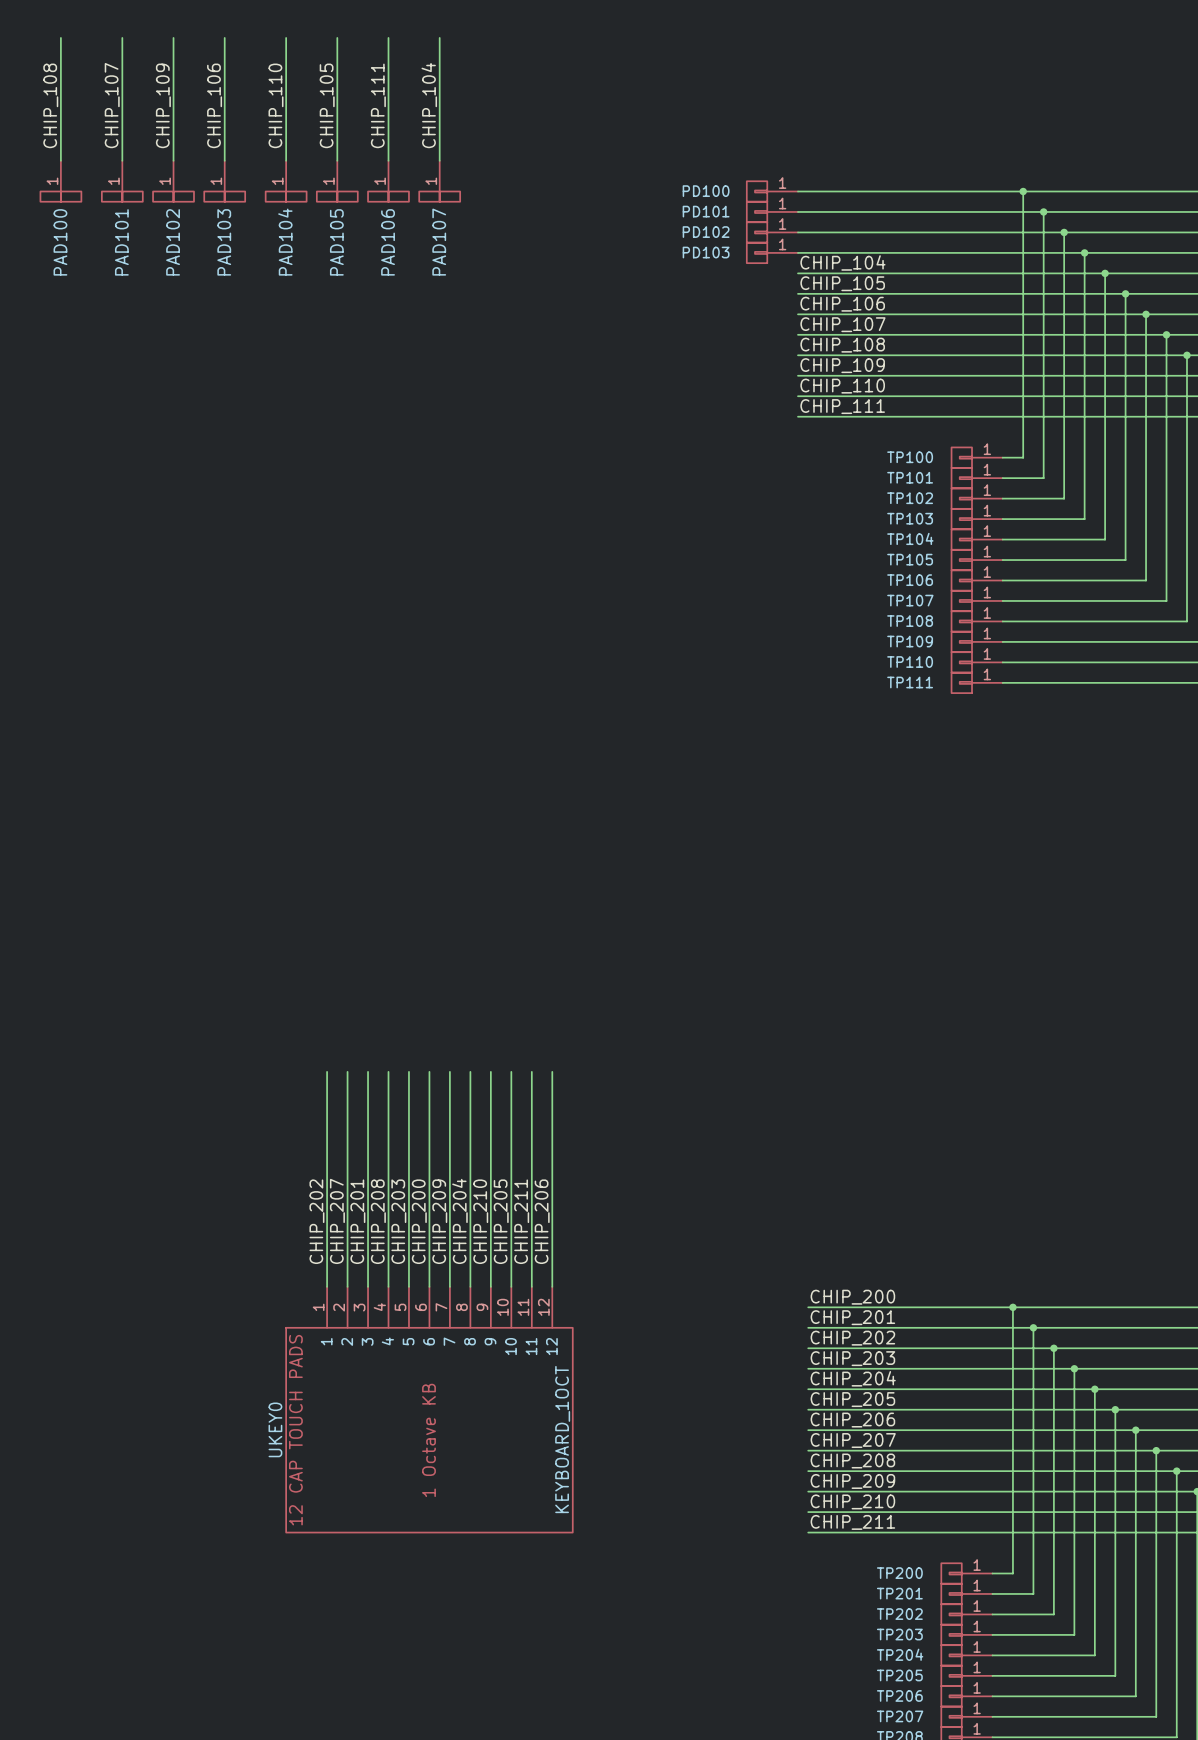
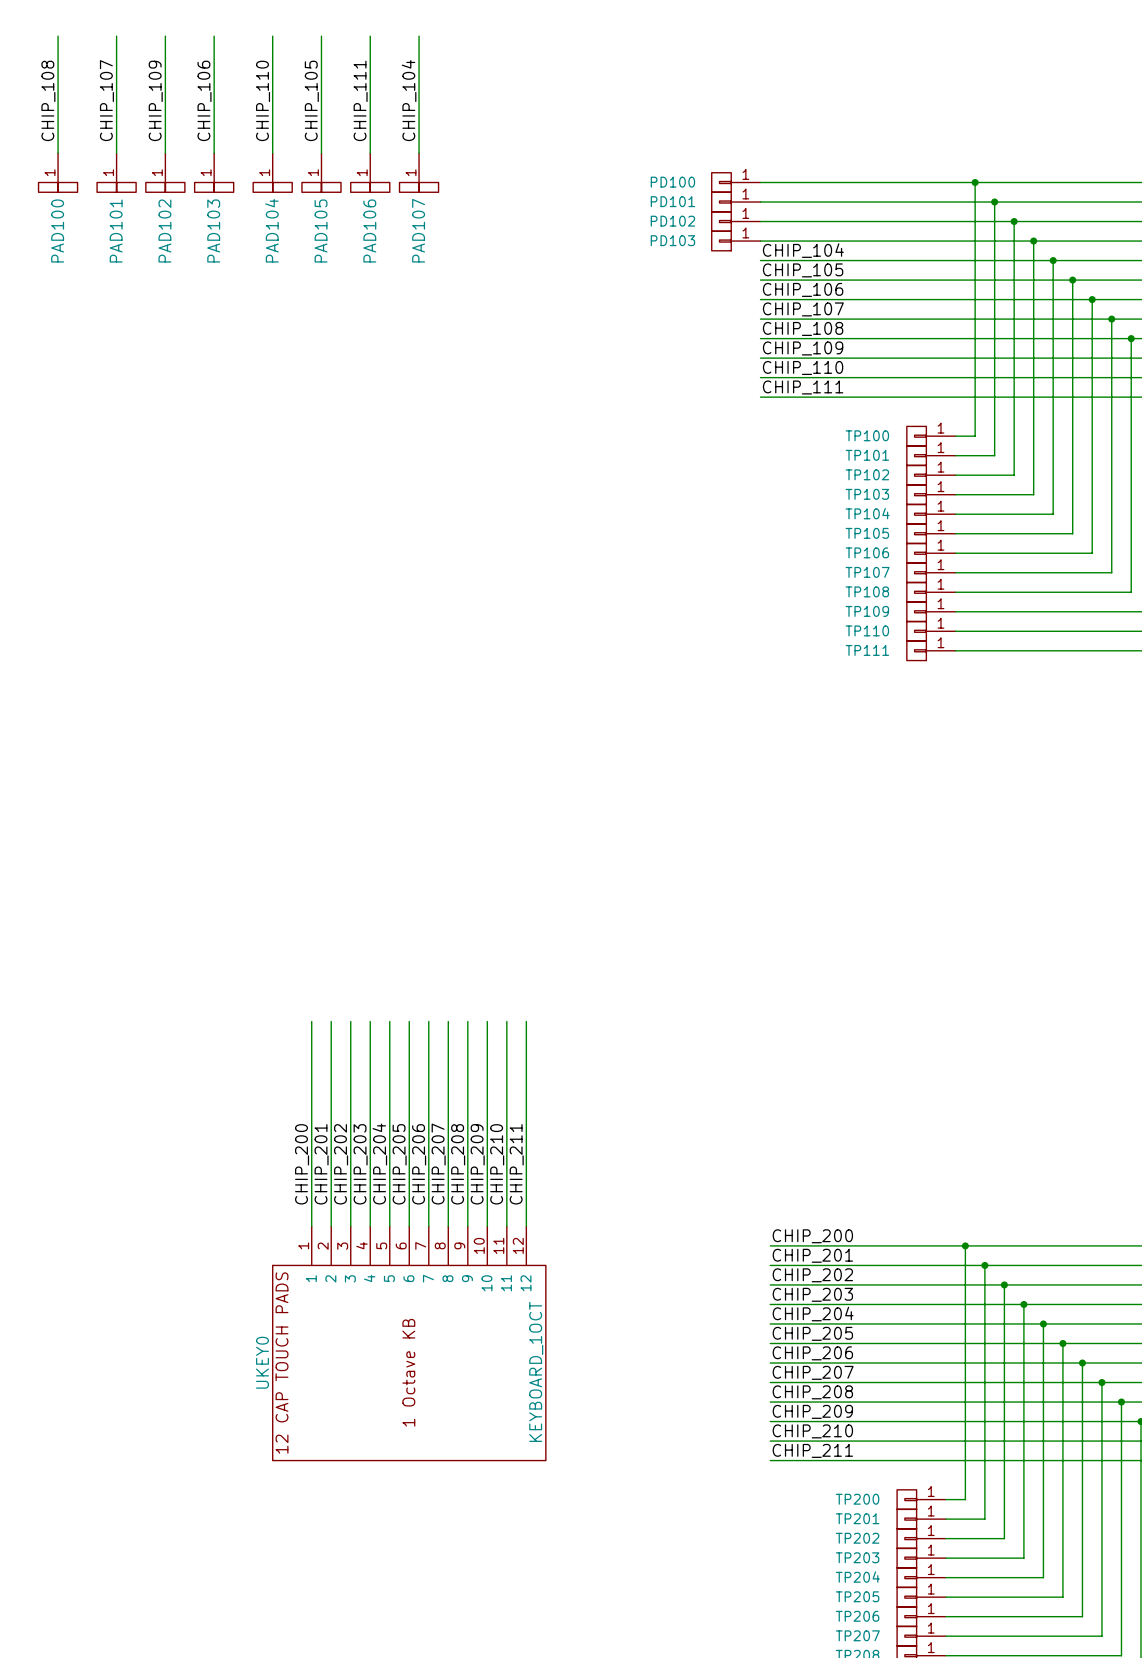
label: CHIP_202 (316, 1221) -> CHIP_200 (302, 1164)
label: CHIP_207 (337, 1221) -> CHIP_201 (321, 1164)
label: CHIP_201 (357, 1221) -> CHIP_202 (341, 1164)
label: CHIP_208 (378, 1221) -> CHIP_203 (360, 1164)
label: CHIP_203 (398, 1221) -> CHIP_204 (379, 1164)
label: CHIP_200 (419, 1221) -> CHIP_205 (399, 1164)
label: CHIP_209 (439, 1221) -> CHIP_206 (419, 1164)
label: CHIP_204 (459, 1221) -> CHIP_207 (438, 1164)
label: CHIP_210 (480, 1221) -> CHIP_208 (458, 1164)
label: CHIP_205 (501, 1221) -> CHIP_209 (477, 1164)
label: CHIP_211 (521, 1221) -> CHIP_210 (497, 1164)
label: CHIP_206 (542, 1221) -> CHIP_211 (516, 1164)

